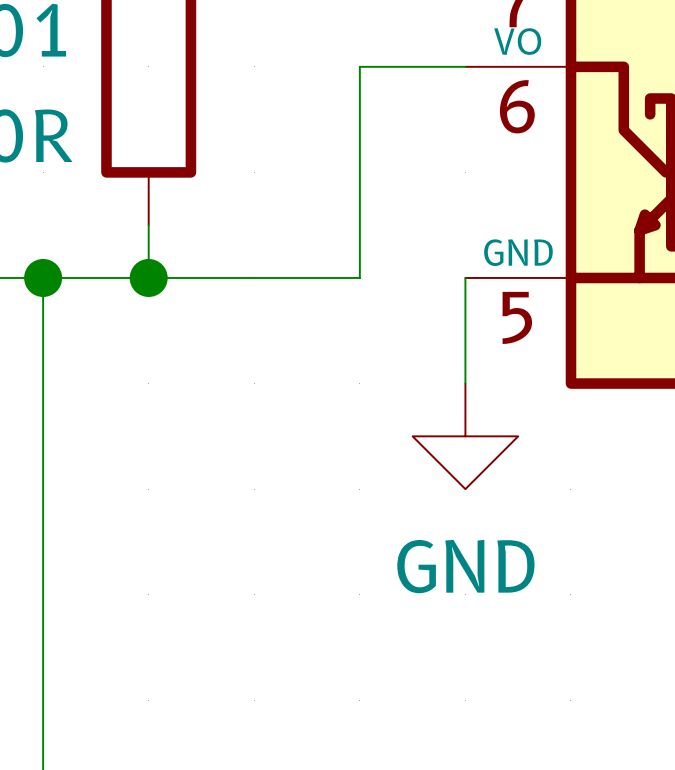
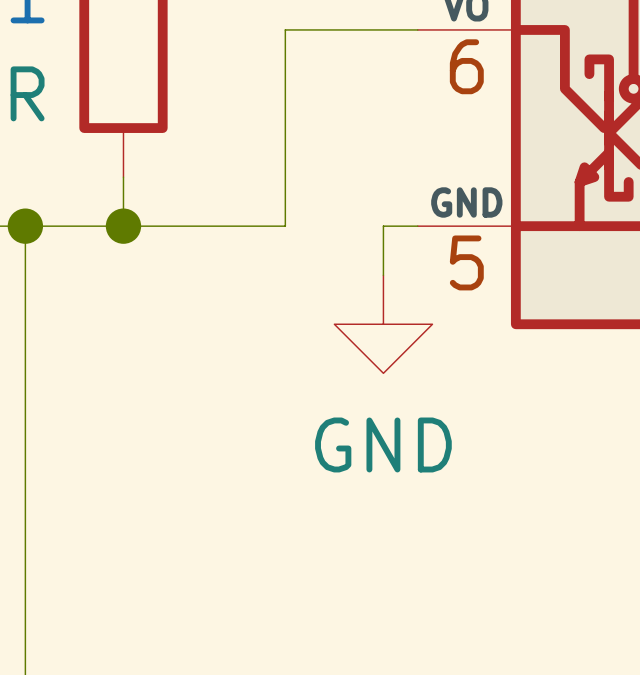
wire: (359, 66) (359, 277) (322, 277) -> (319, 29) (285, 29) (285, 226)
wire: (465, 277) (465, 383) -> (417, 226) (383, 226) (383, 275)
power symbol position: GND (465, 436) -> GND (383, 324)

